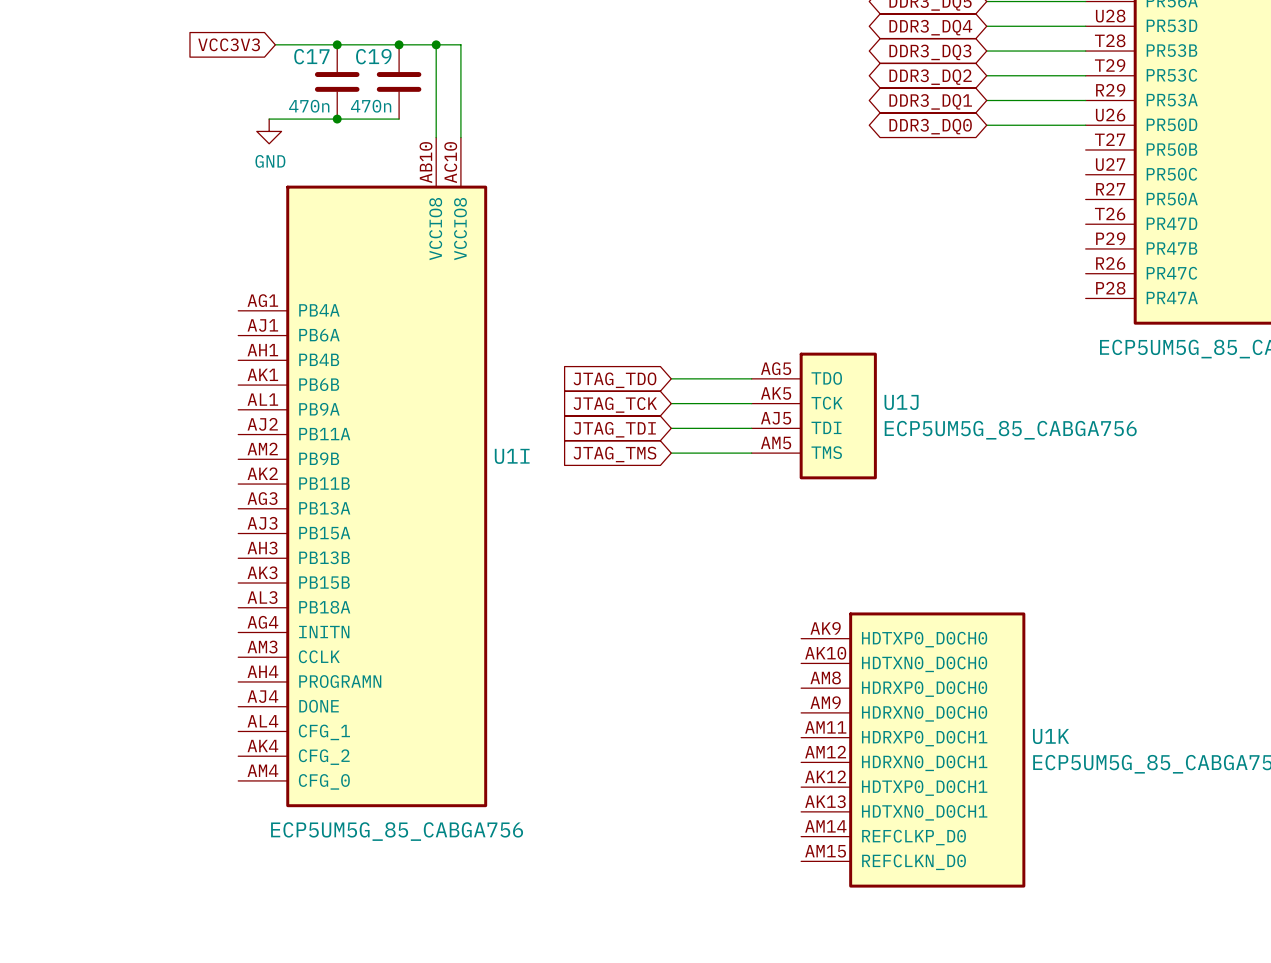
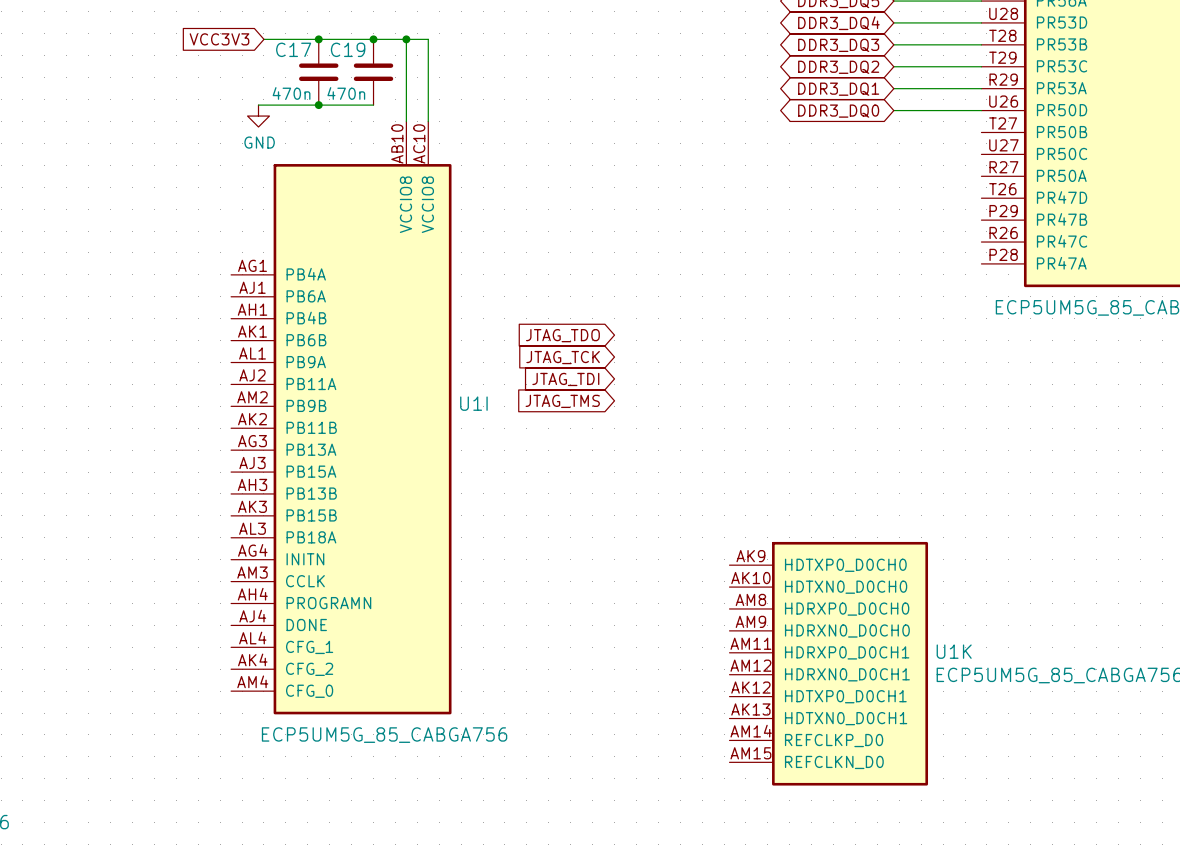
wire: (671, 378) (751, 378) -> none
wire: (671, 403) (751, 403) -> none
U1J: ECP5UM5G_85_CABGA756 (814, 415) -> none
wire: (671, 428) (751, 428) -> none
wire: (671, 453) (751, 453) -> none

